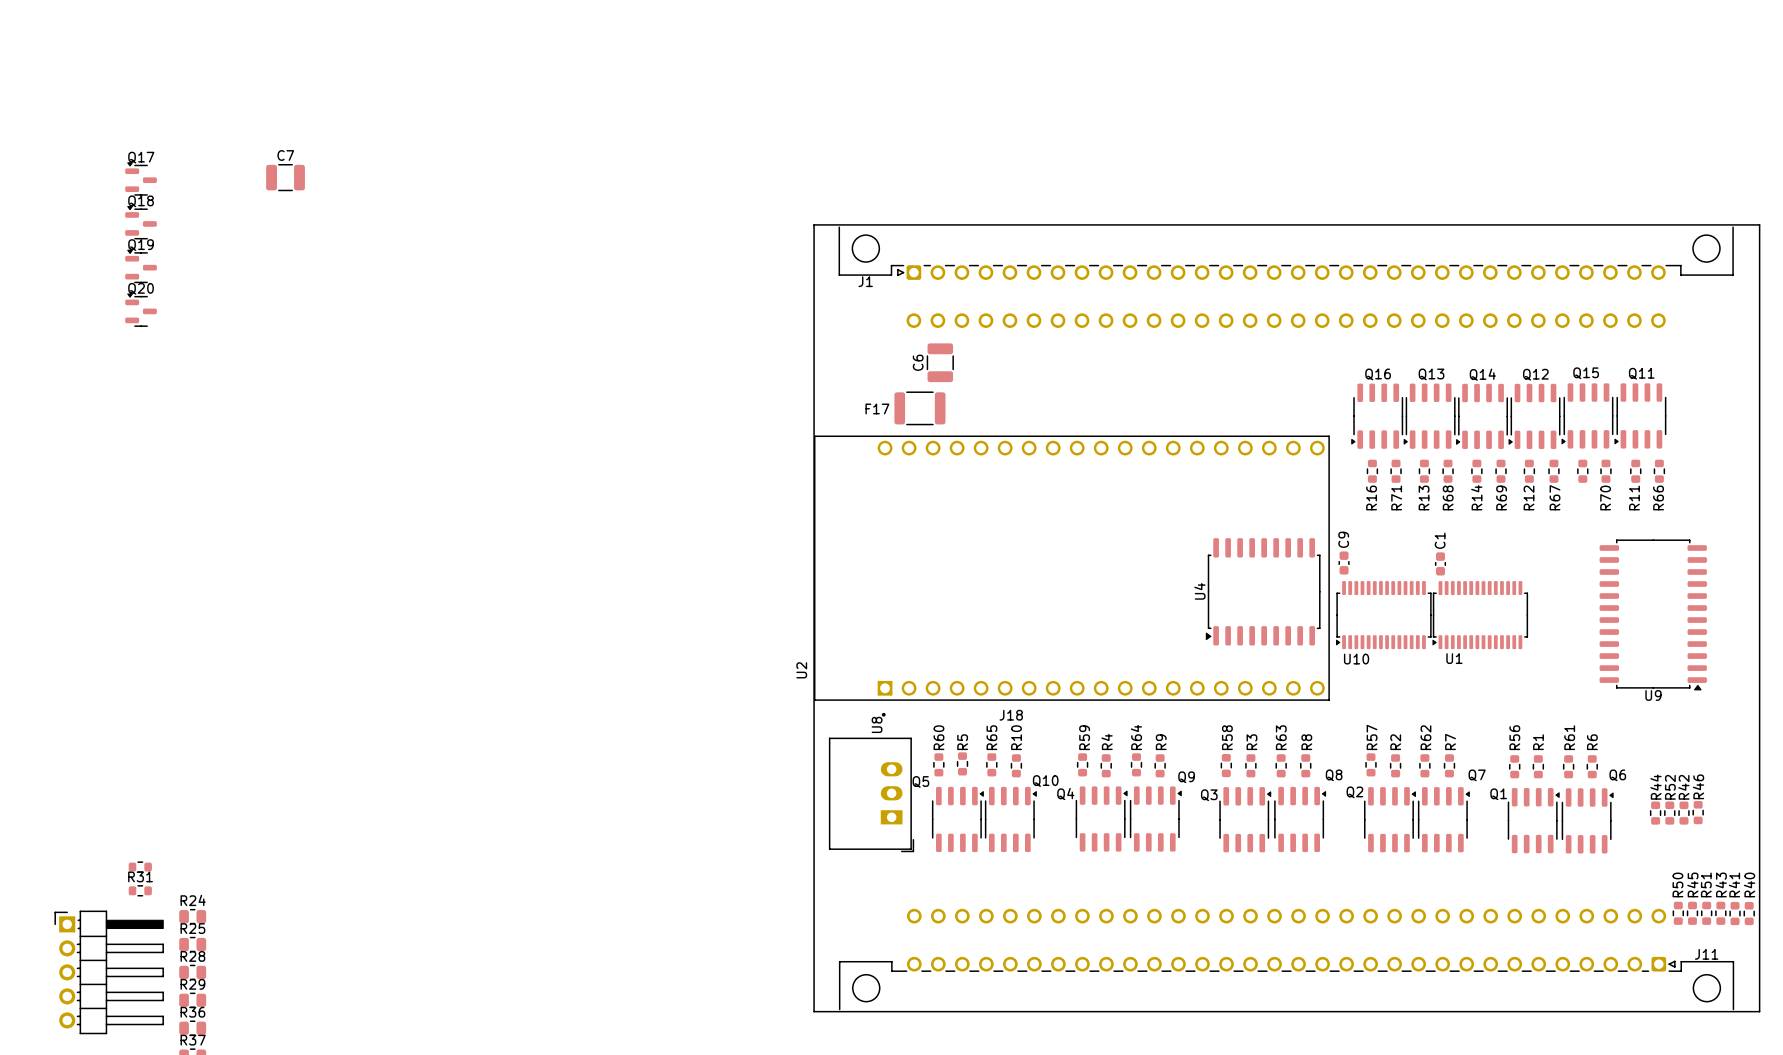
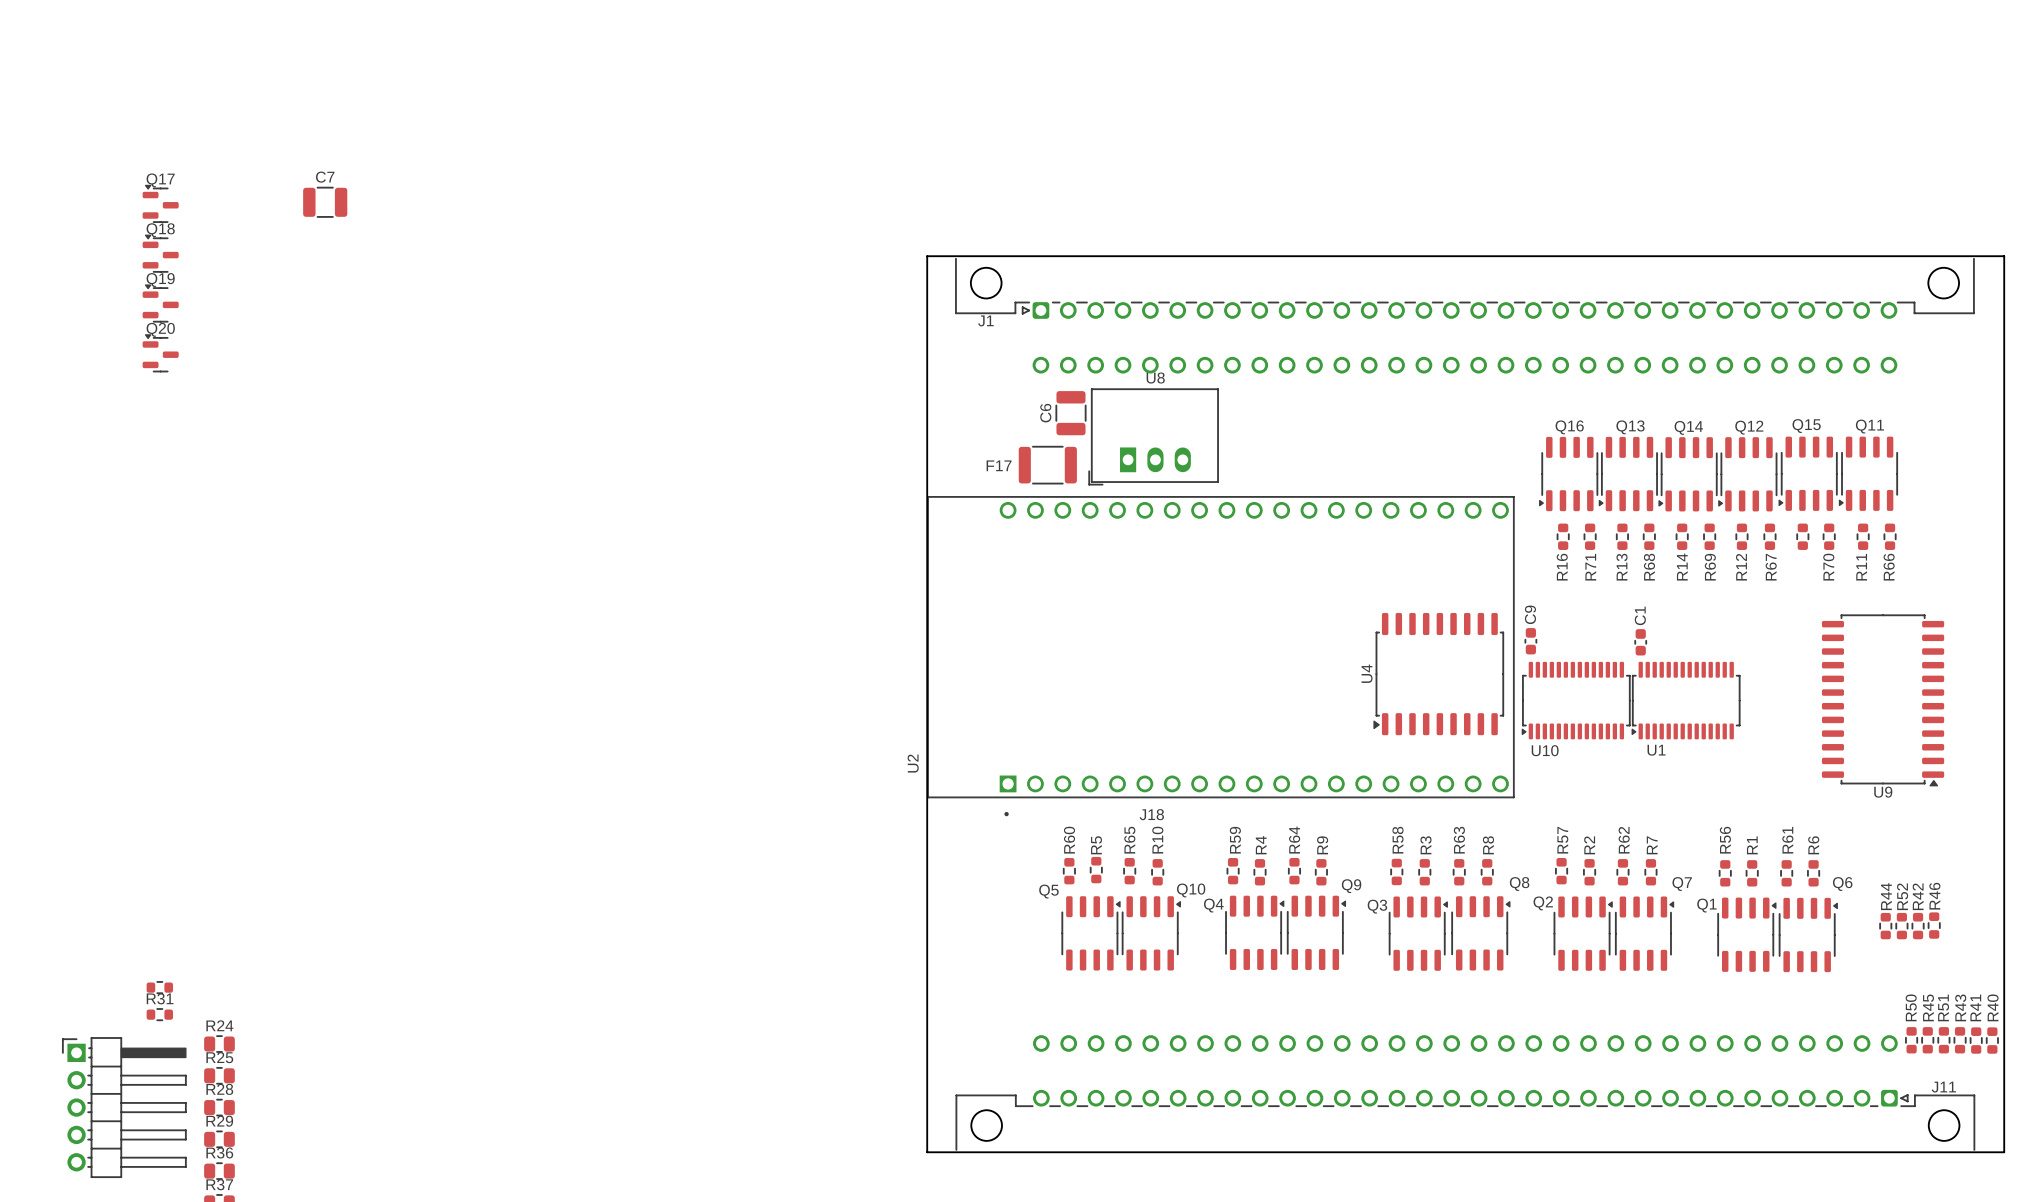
U8 name position: U8 (877, 724) -> U8 (1155, 378)
U8 rotation: 0° (871, 794) -> 90° clockwise (1153, 436)
U8 position: (871, 794) -> (1153, 436)

